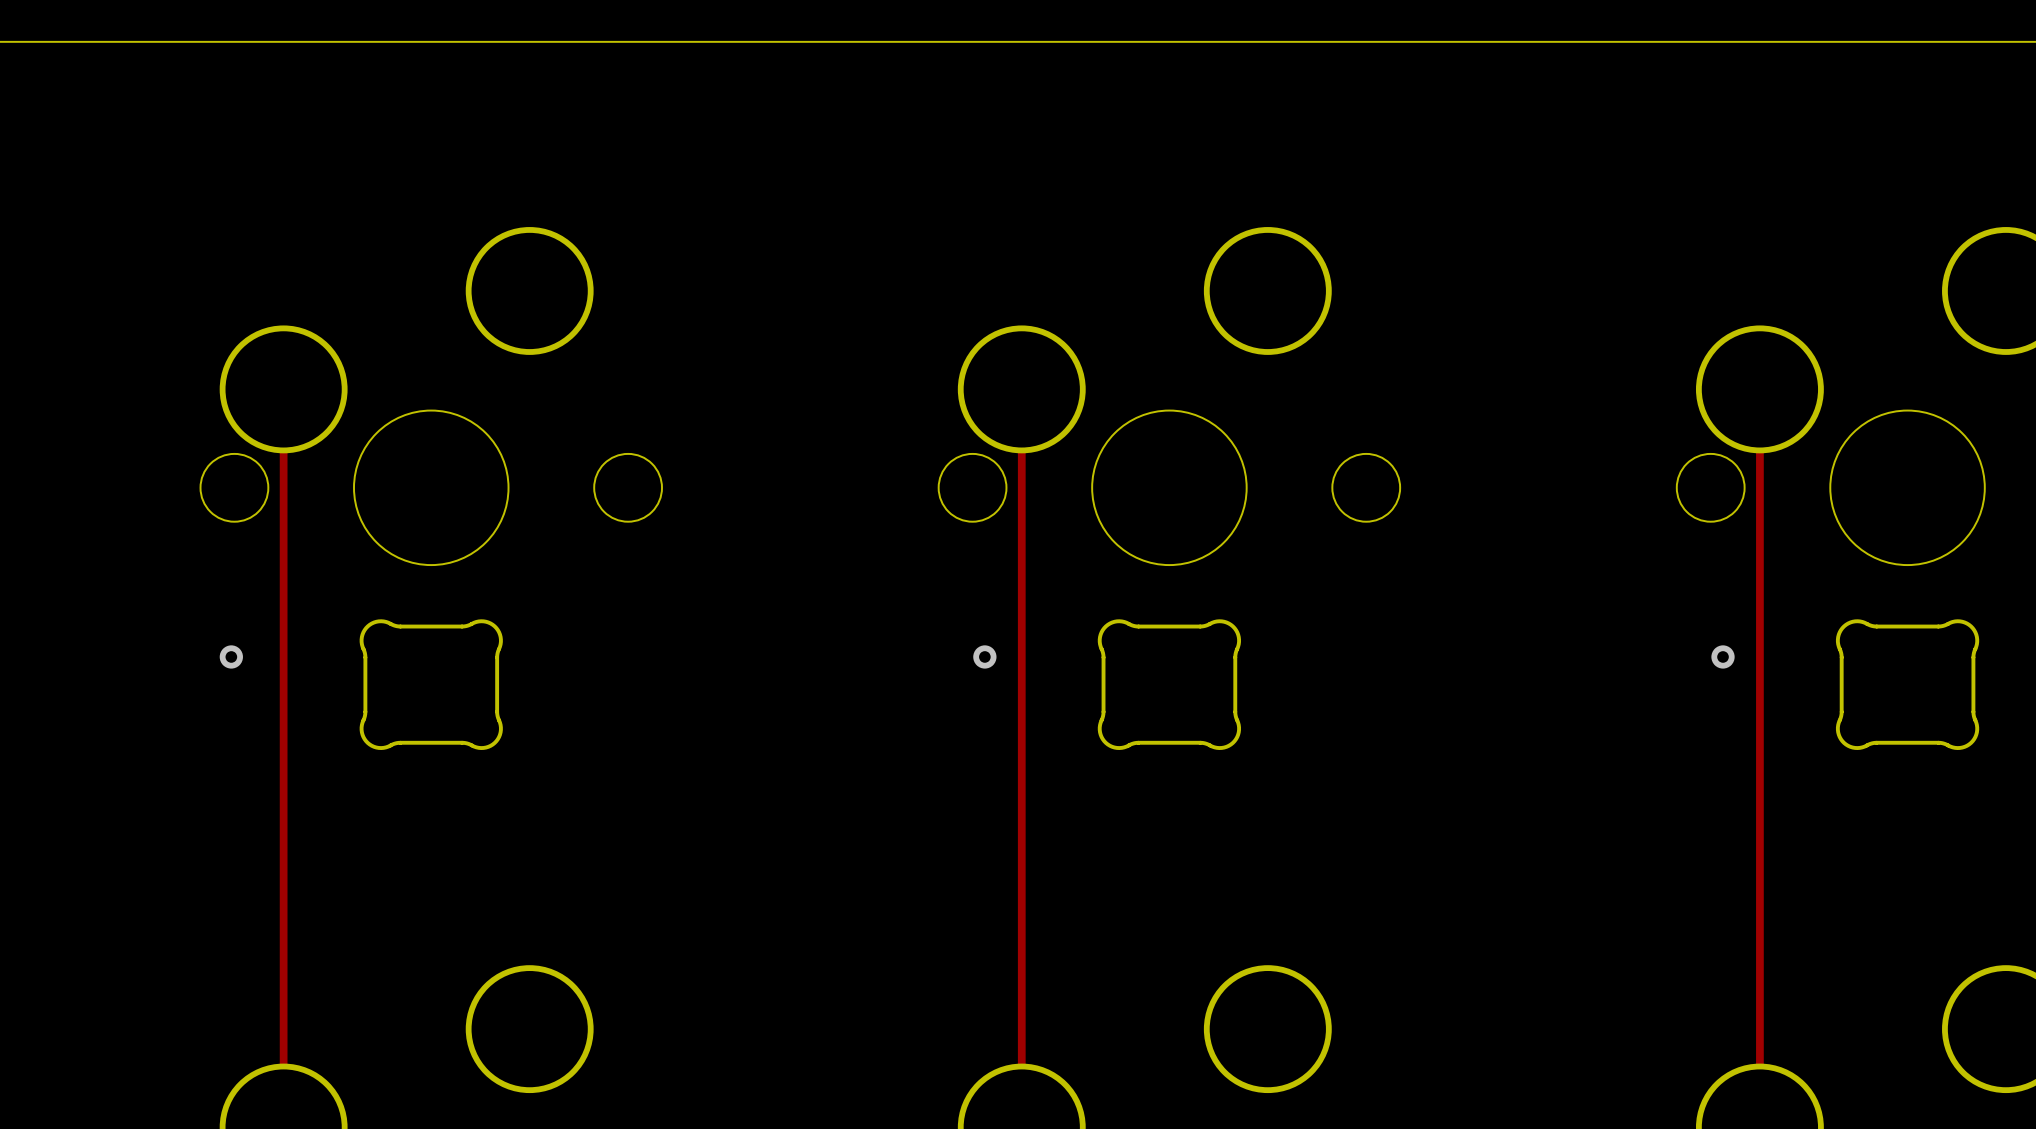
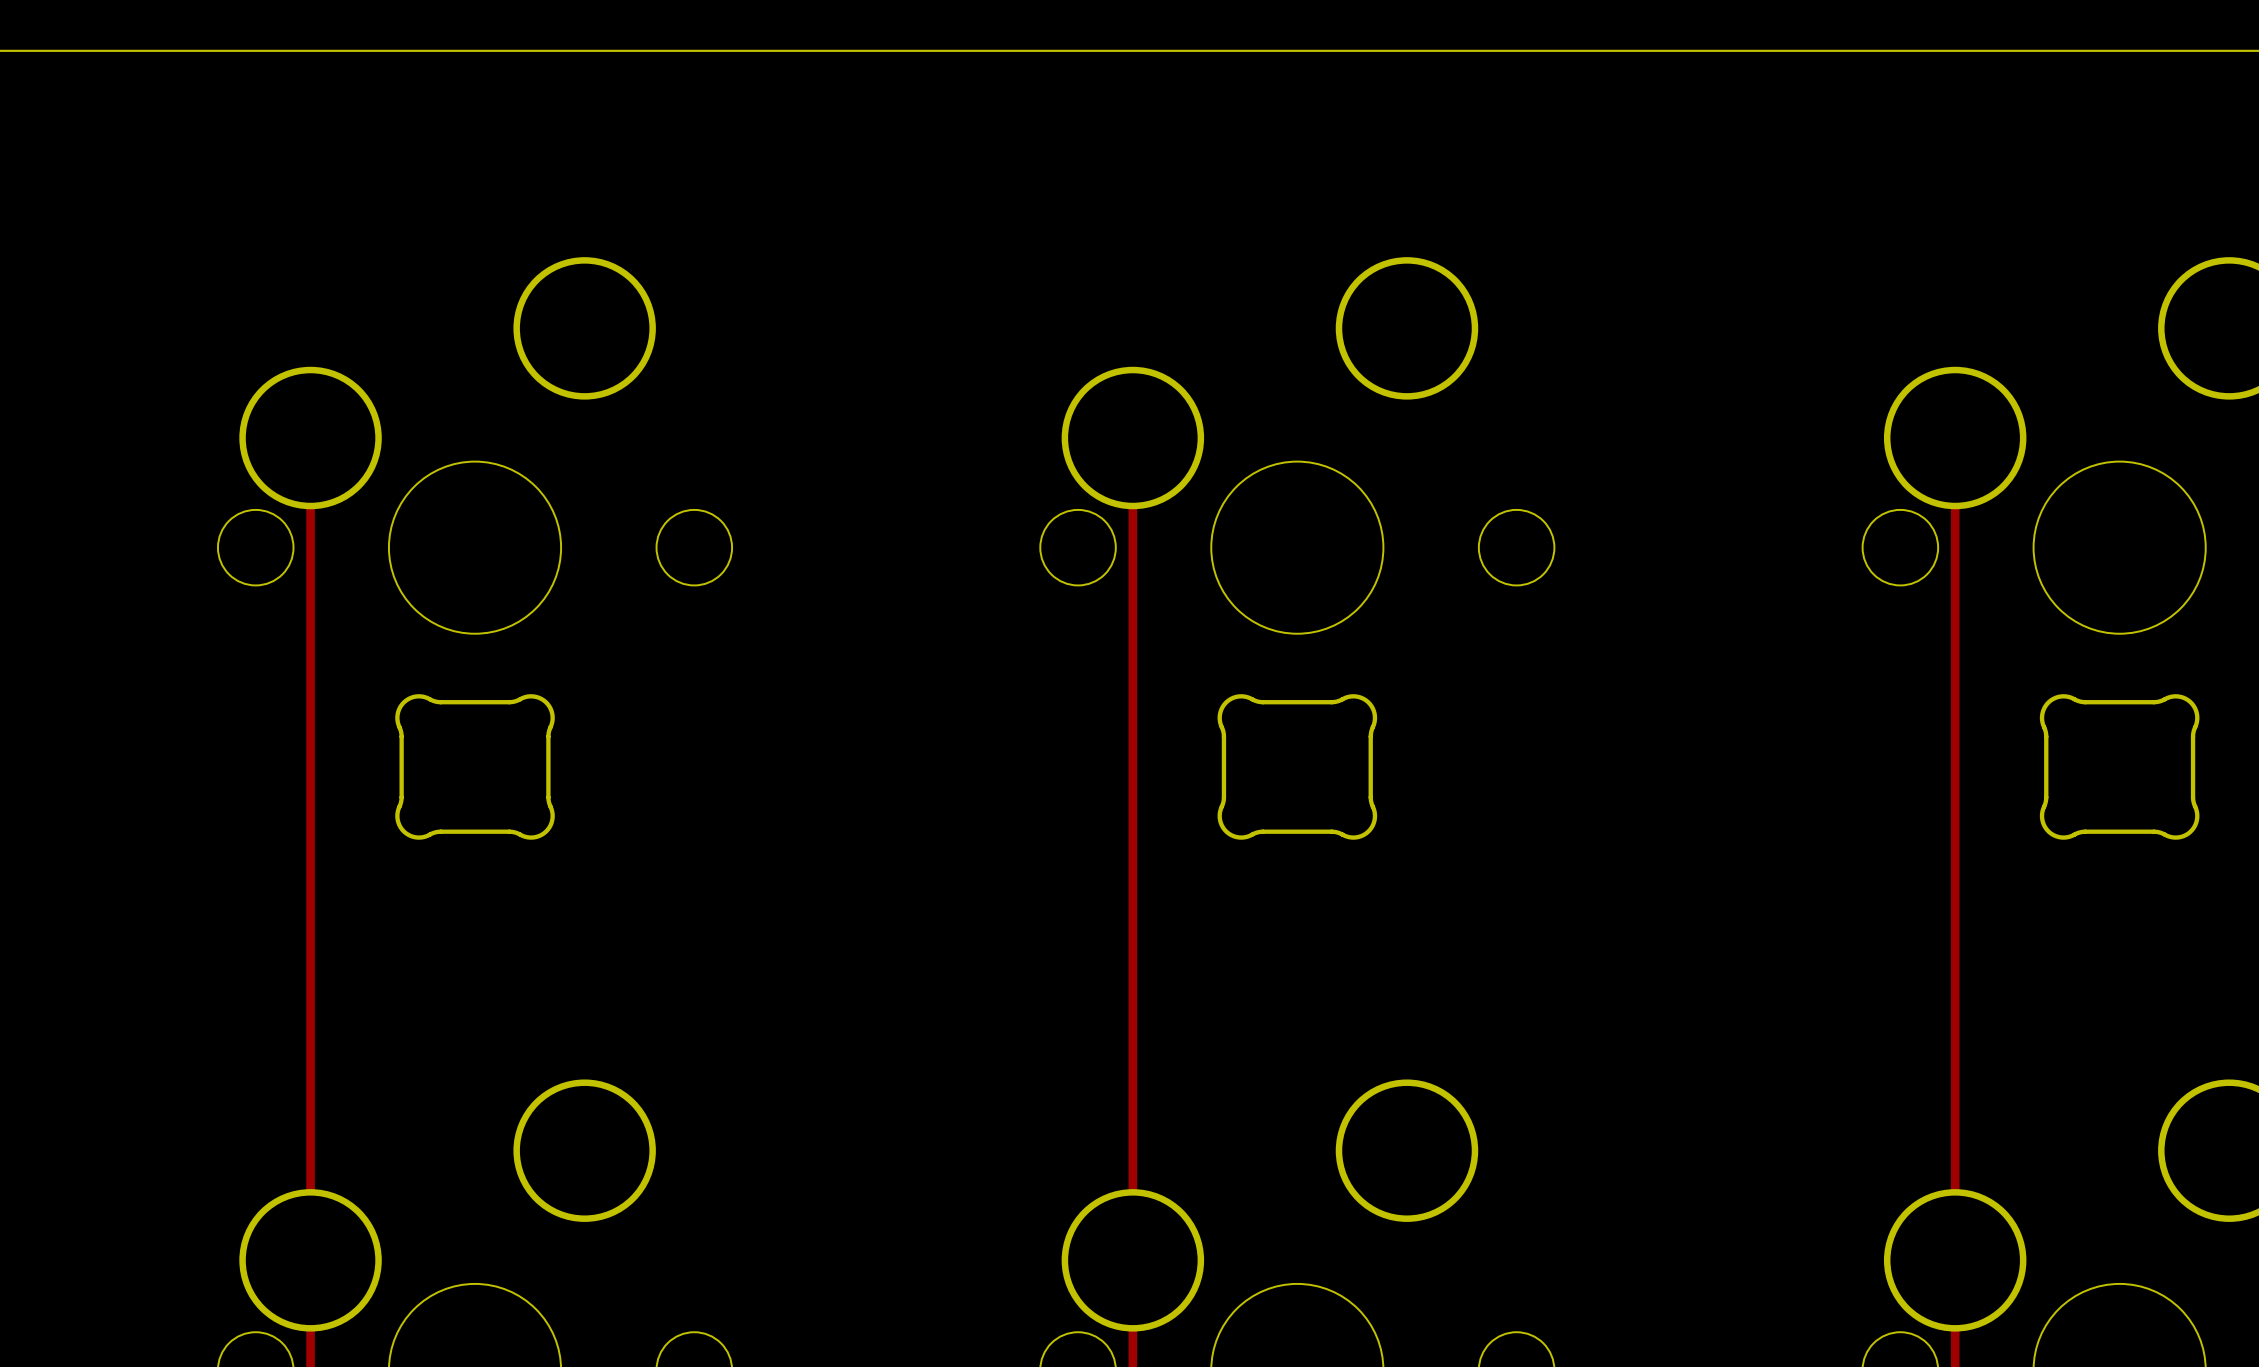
via: (231, 656) -> none
via: (984, 656) -> none
via: (1723, 656) -> none

